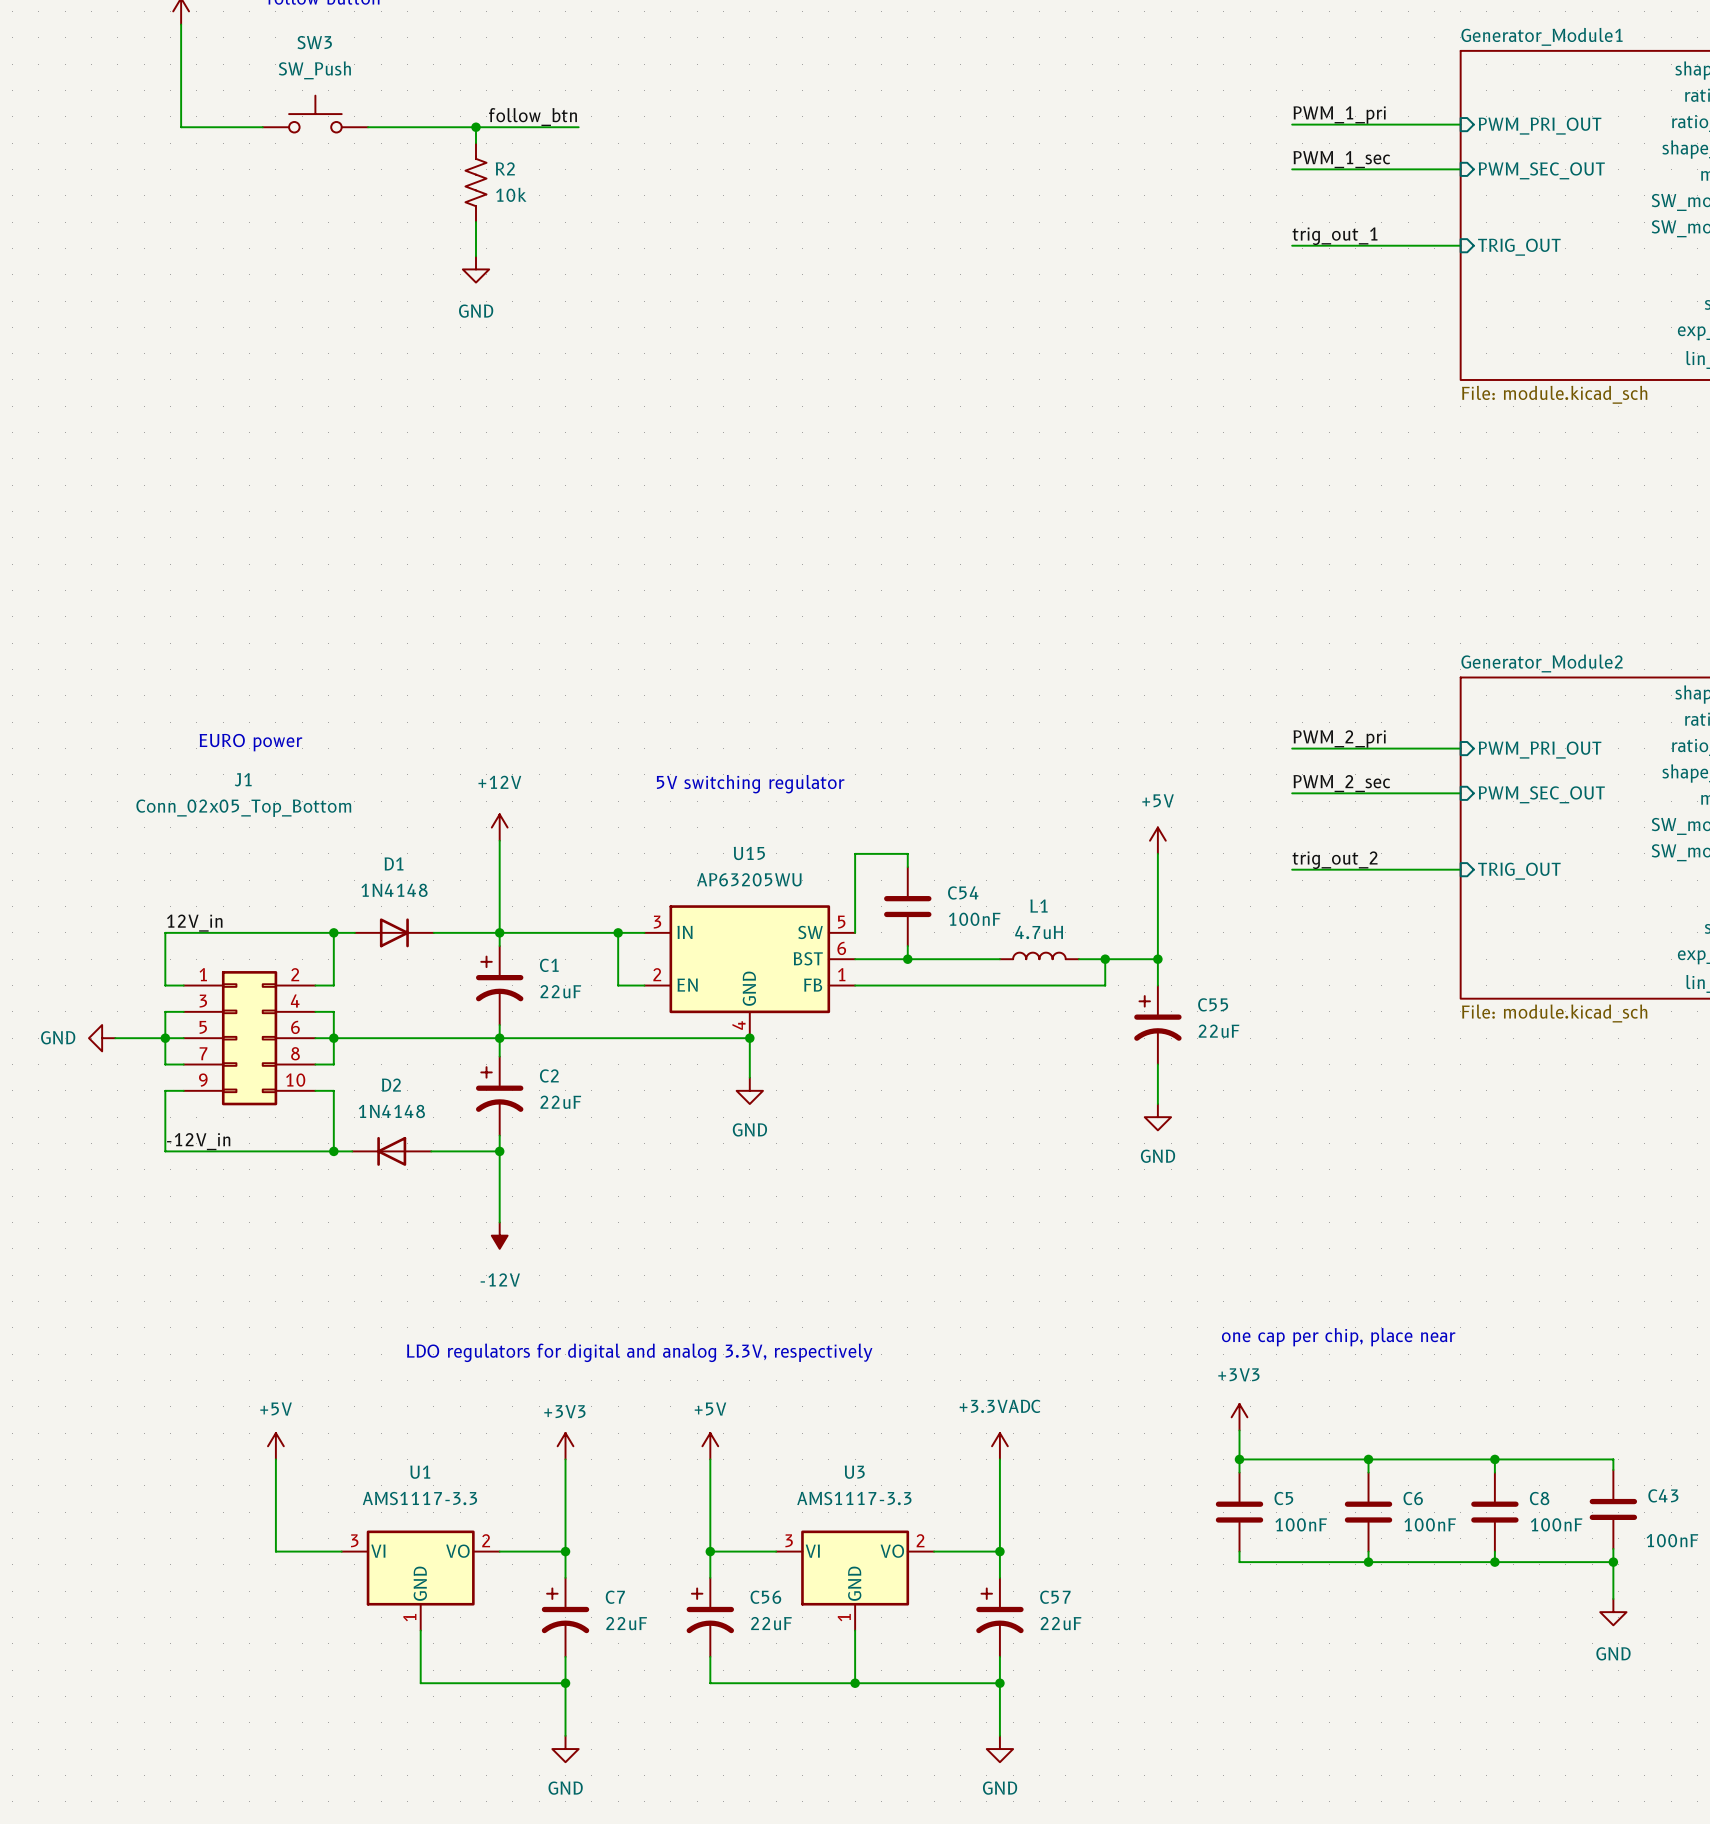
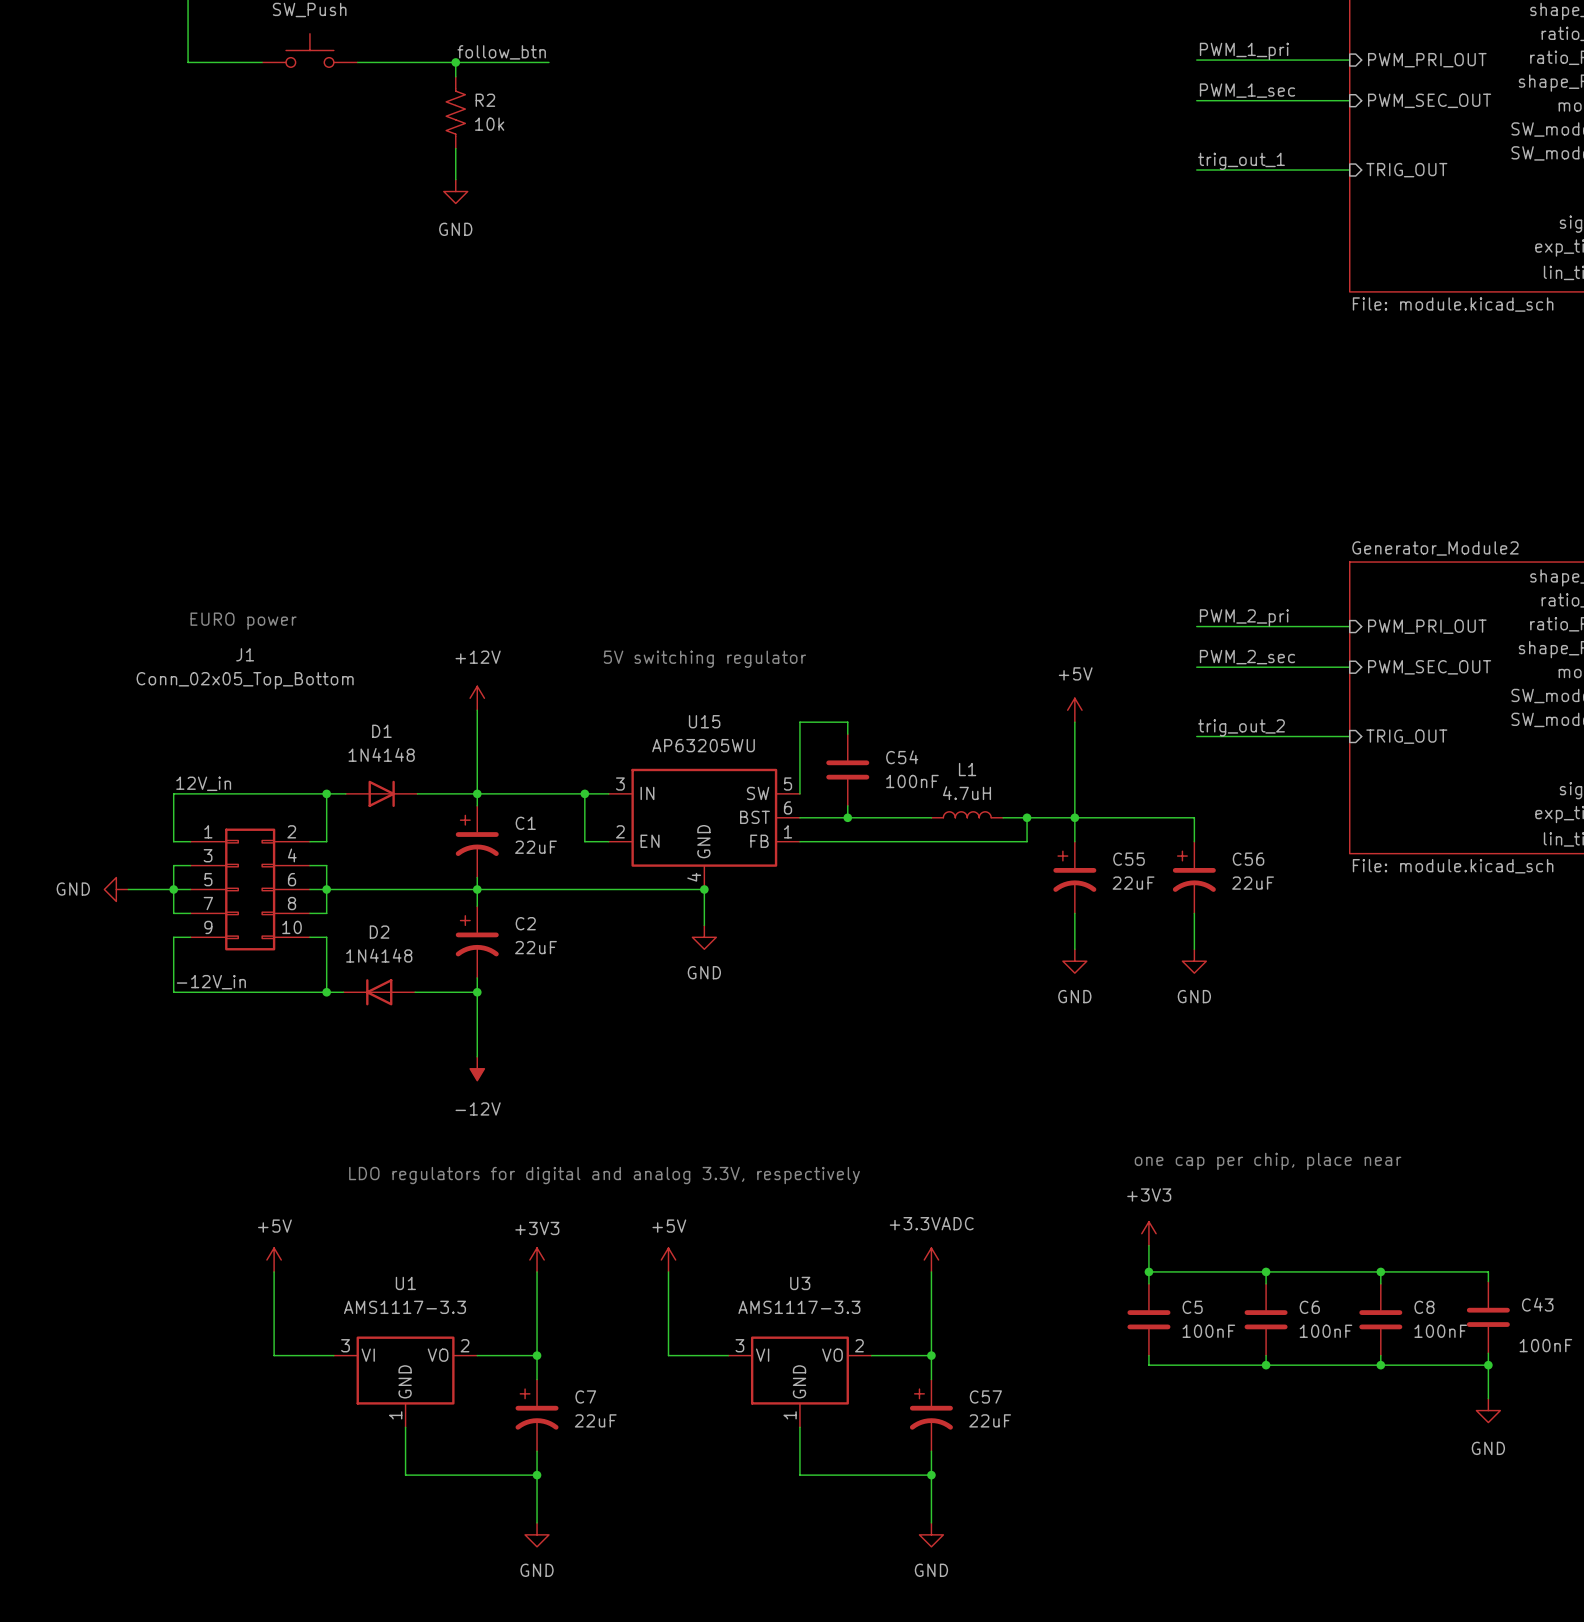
wire: none -> (1074, 817) (1194, 817) (1194, 841)
wire: none -> (1194, 913) (1194, 949)
power symbol: none -> GND (1194, 961)
wire: (710, 1551) (710, 1577) -> none
junction: (710, 1551) -> none
C56 position: (710, 1617) -> (1194, 877)
wire: (710, 1656) (710, 1683) (855, 1683) -> none
junction: (855, 1683) -> none

